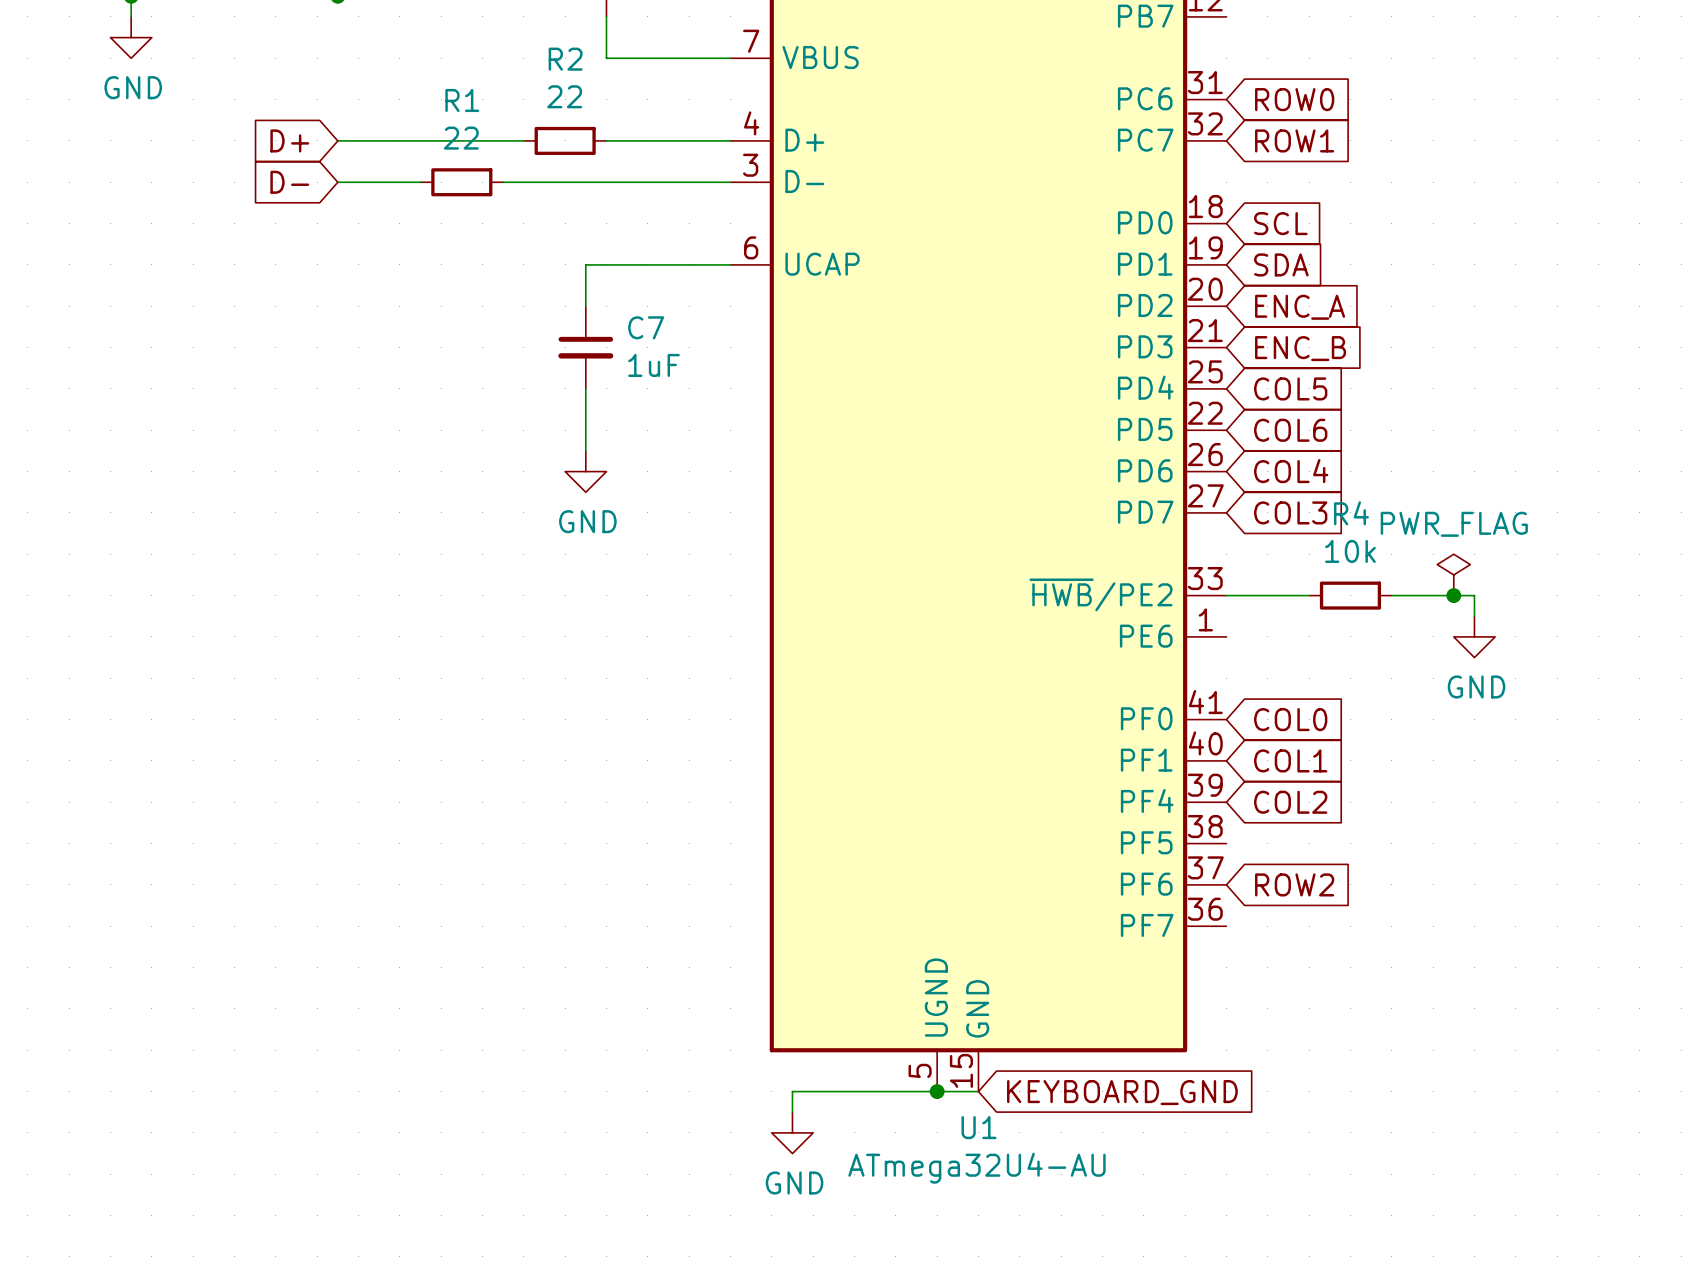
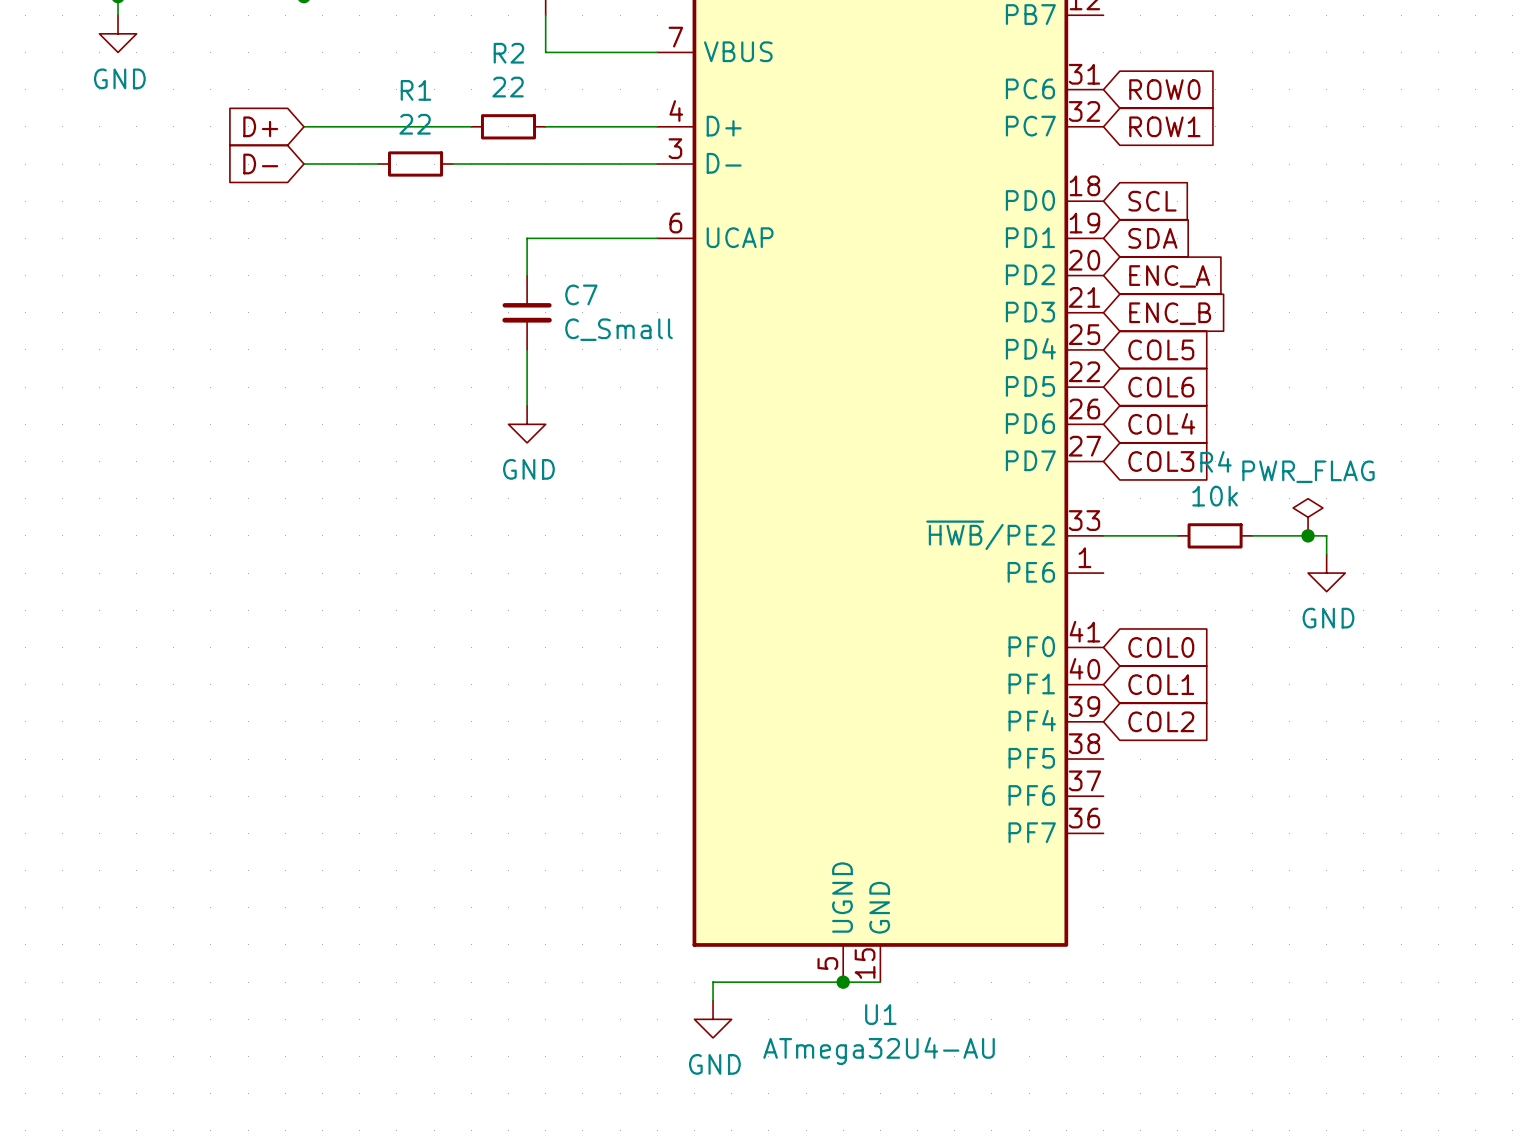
C7 value: 1uF (654, 365) -> C_Small (618, 329)
global label: ROW2 (1294, 884) -> none
global label: KEYBOARD_GND (1122, 1092) -> none

